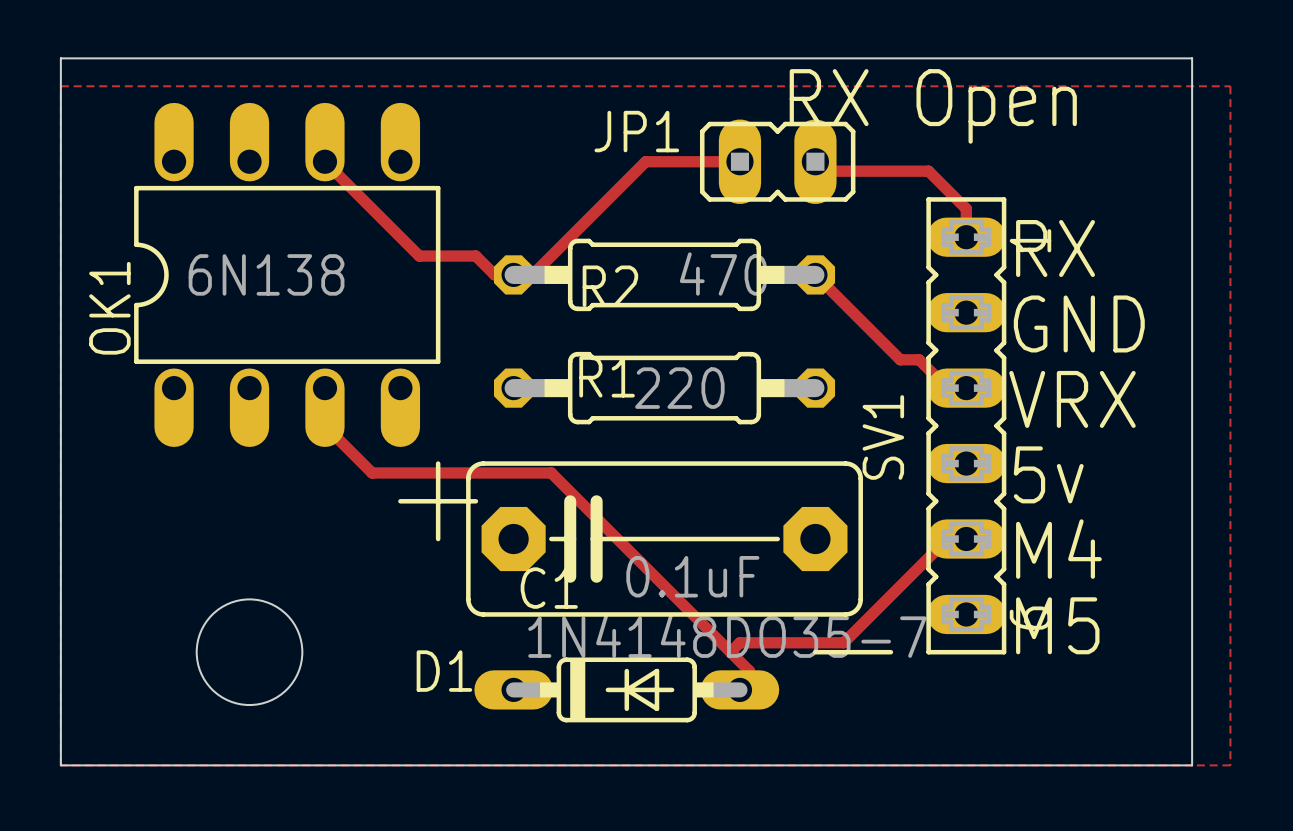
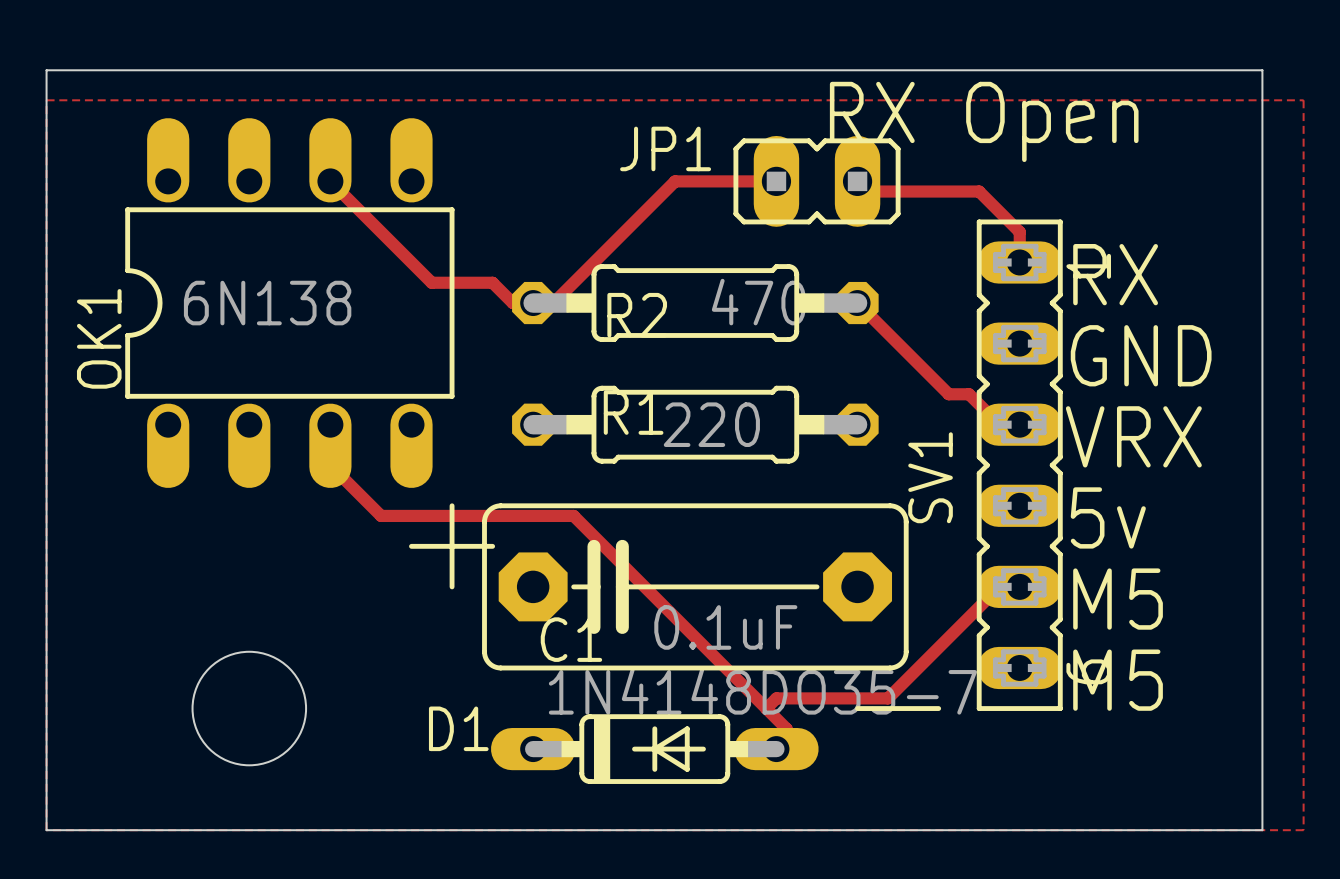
text: M4 (1058, 549) -> M5 (1118, 599)

